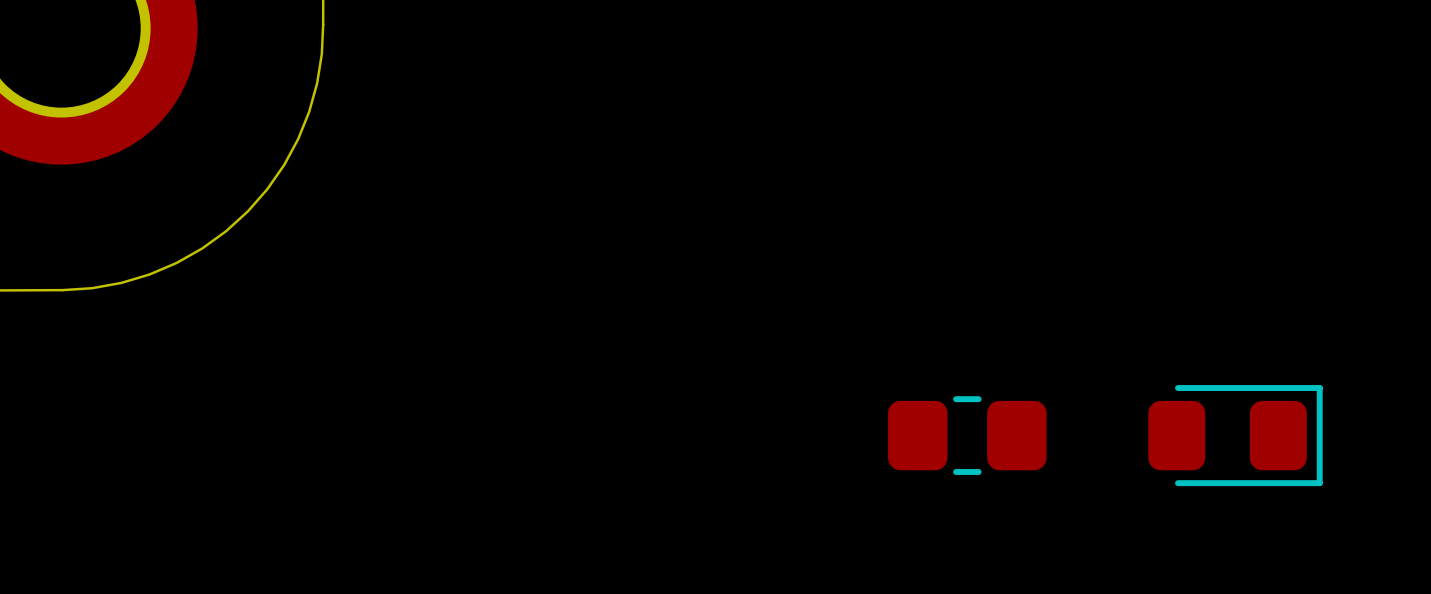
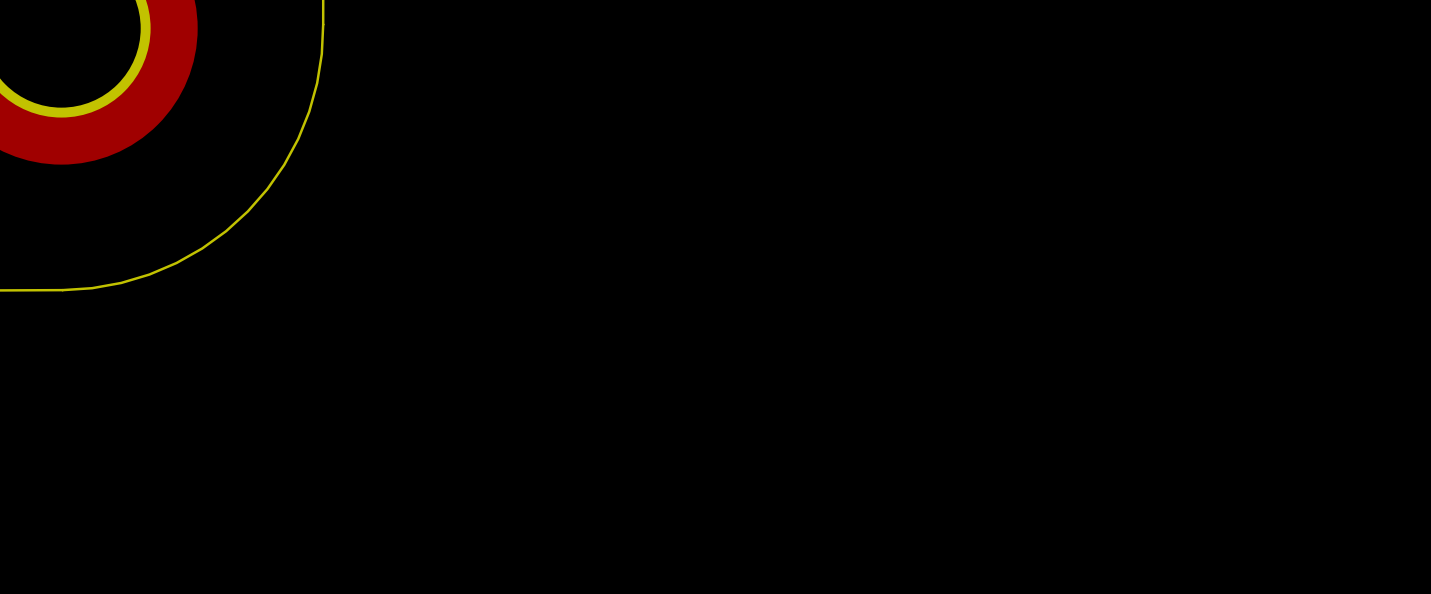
part: (967, 435) -> none
part: (1235, 435) -> none

